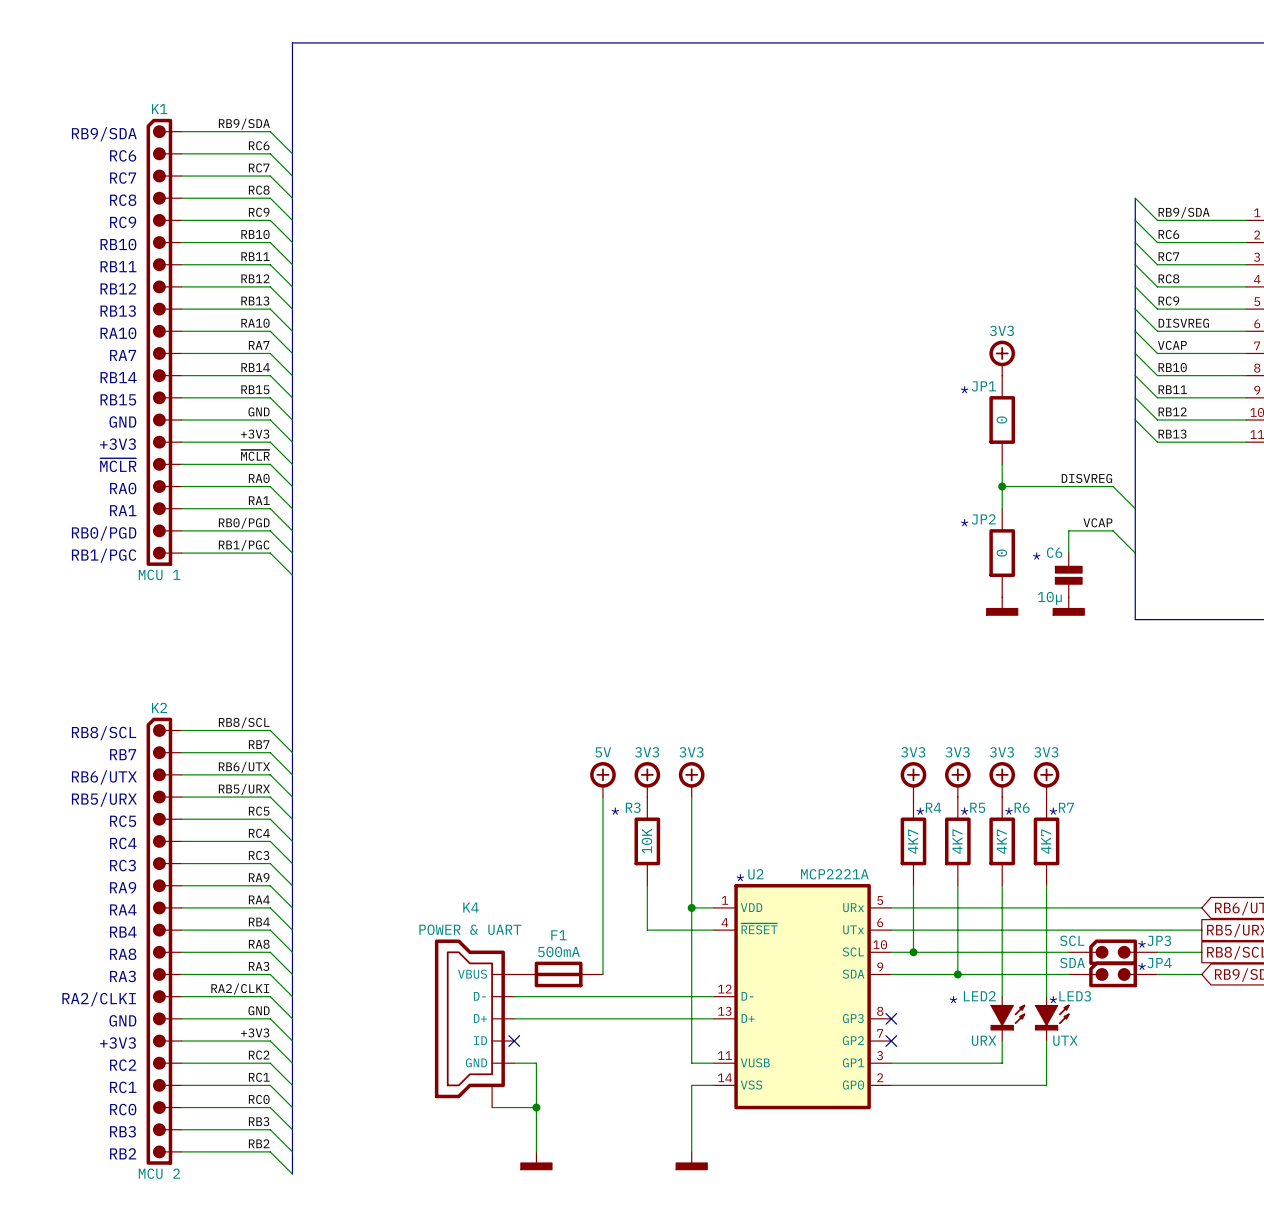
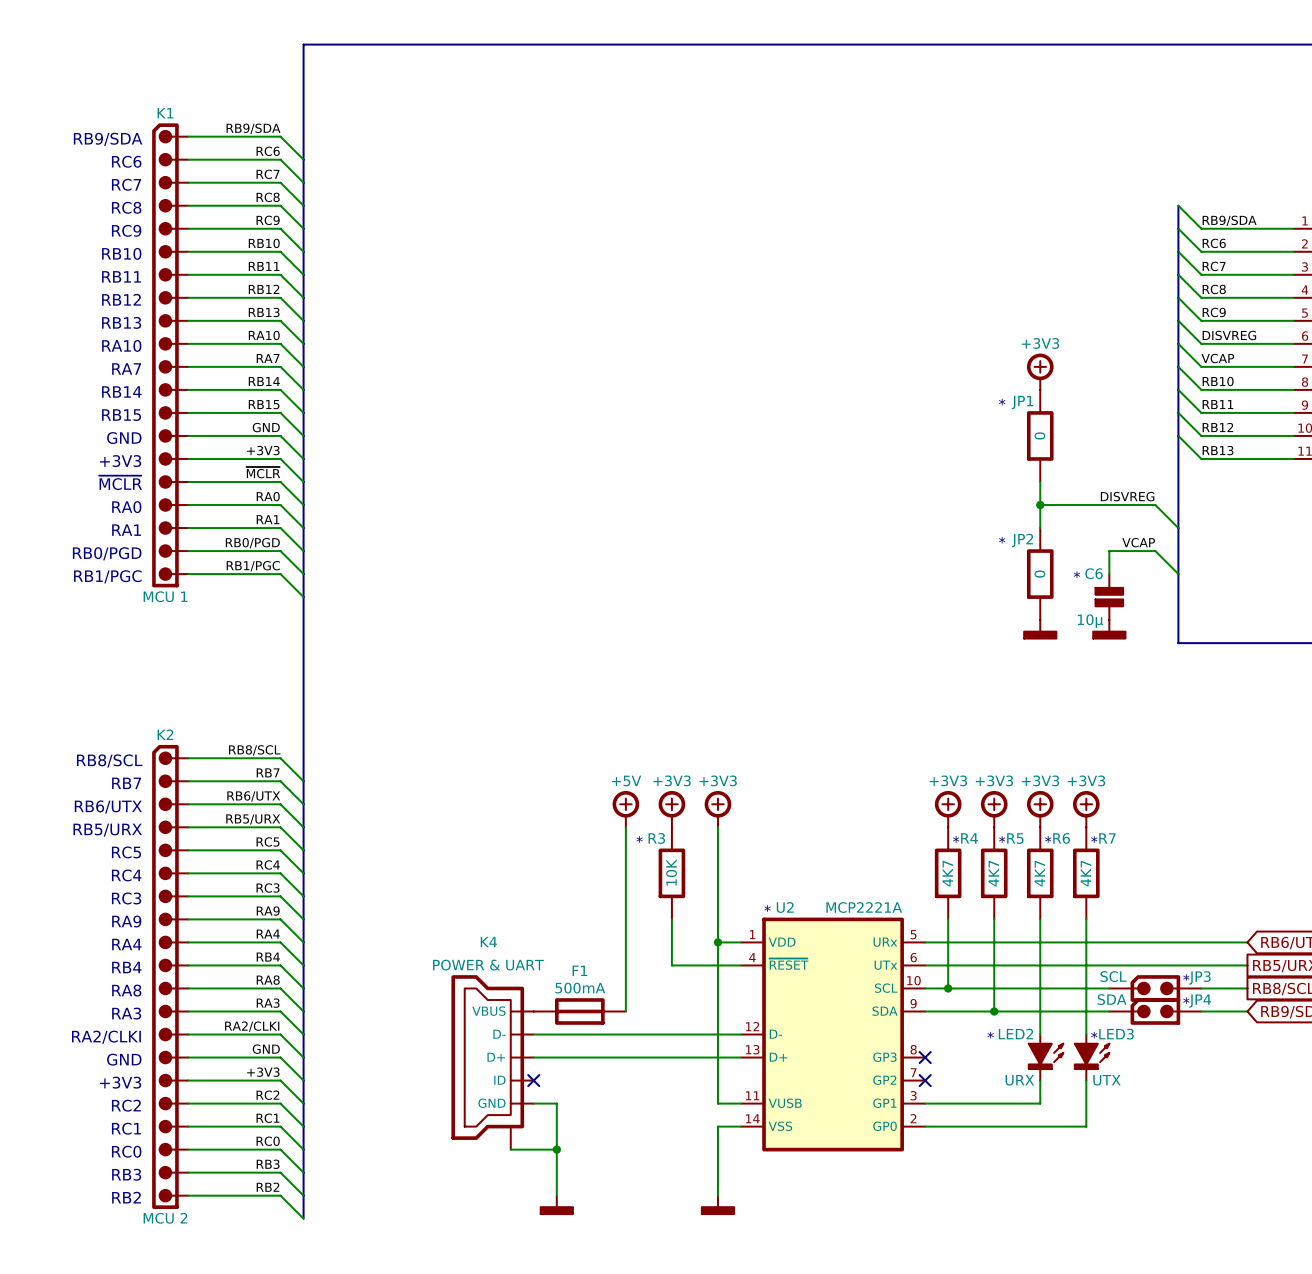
power symbol text: 3V3 (1001, 330) -> +3V3 (1040, 343)
power symbol text: 5V (603, 752) -> +5V (626, 780)
power symbol text: 3V3 (647, 752) -> +3V3 (672, 780)
power symbol text: 3V3 (691, 752) -> +3V3 (718, 780)
power symbol text: 3V3 (913, 752) -> +3V3 (948, 780)
power symbol text: 3V3 (957, 752) -> +3V3 (994, 780)
power symbol text: 3V3 (1001, 752) -> +3V3 (1040, 780)
power symbol text: 3V3 (1046, 752) -> +3V3 (1086, 780)

